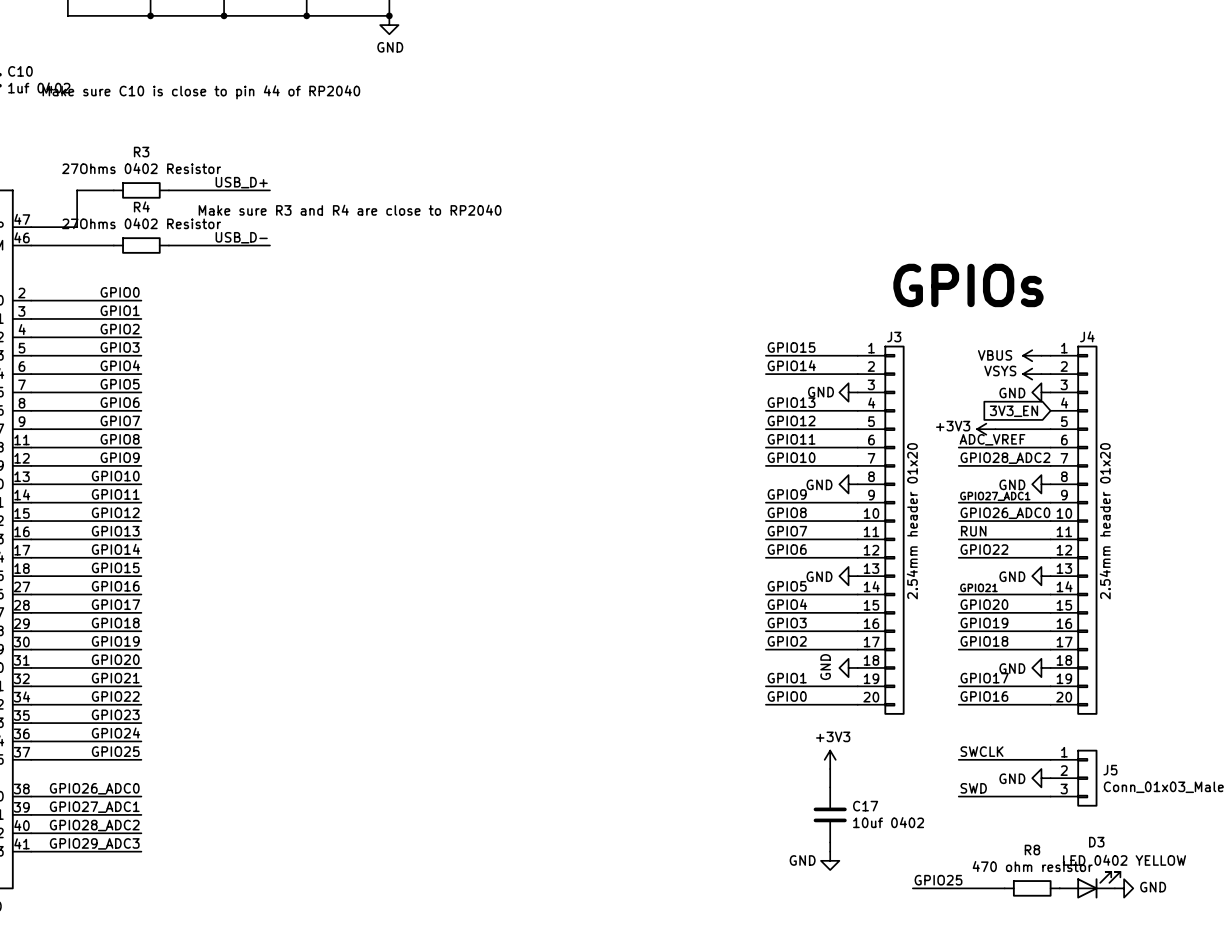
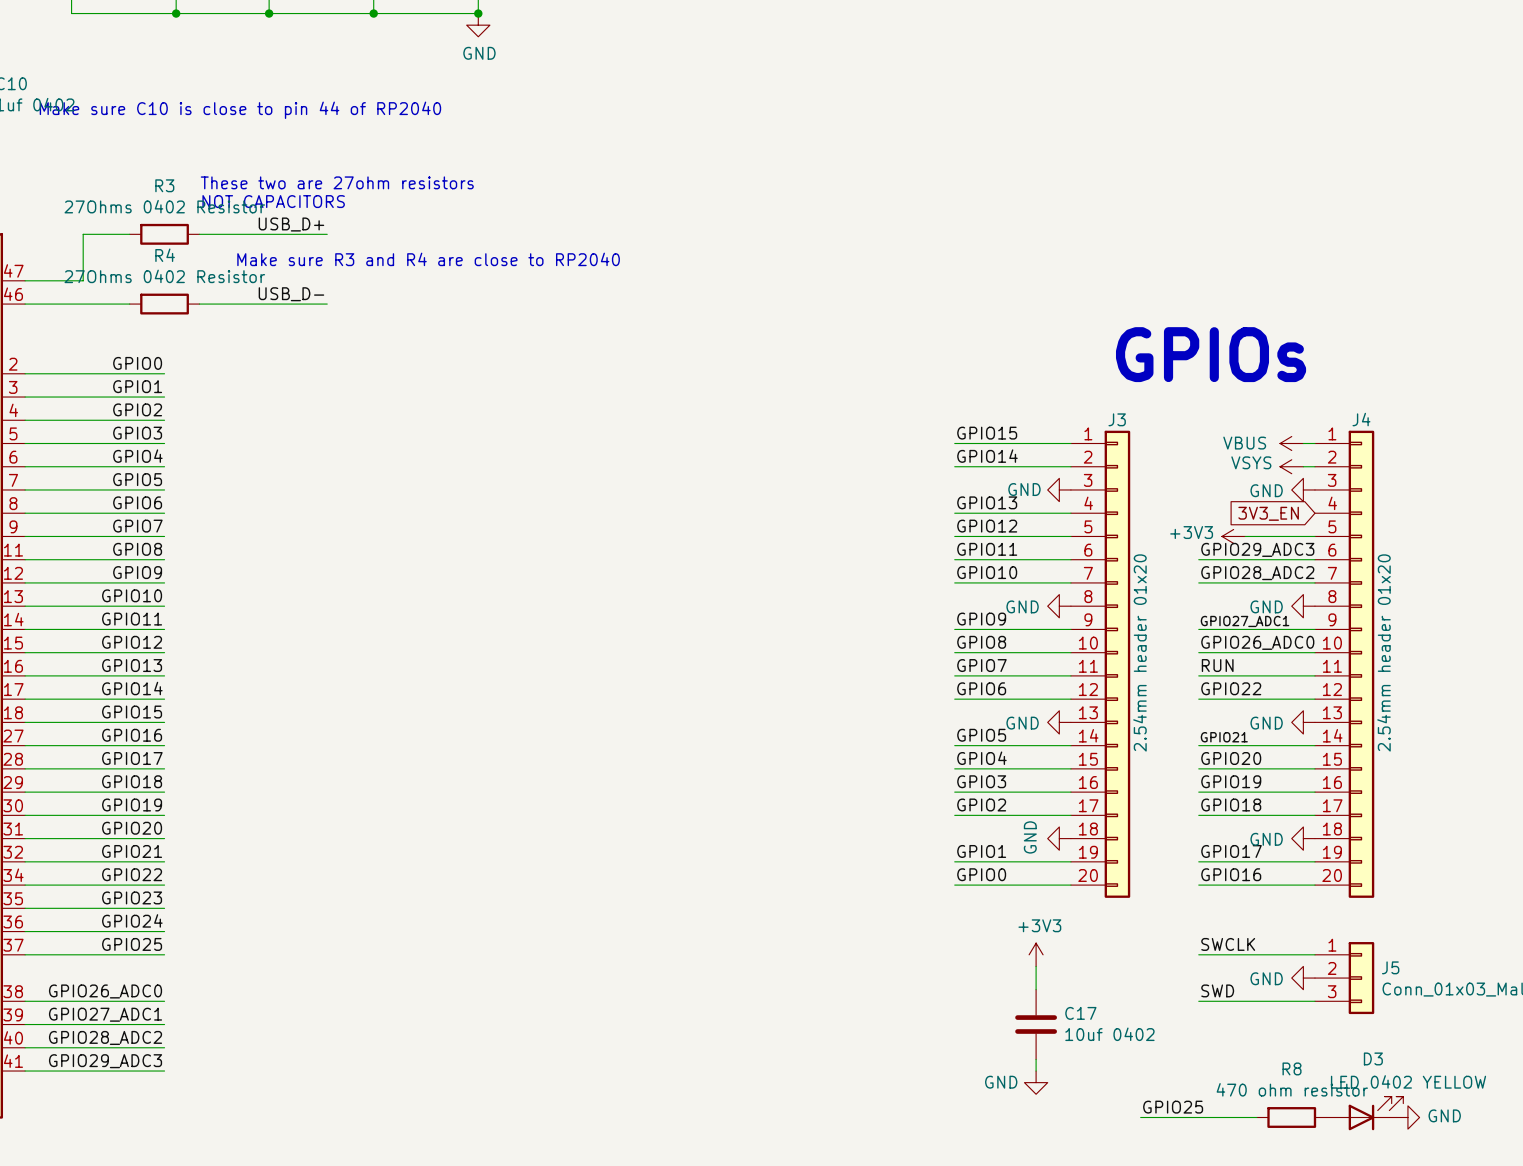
text: none -> These two are 27ohm resistors (337, 182)
text: none -> NOT CAPACITORS (273, 201)
label: ADC_VREF (992, 439) -> GPIO29_ADC3 (1257, 549)

